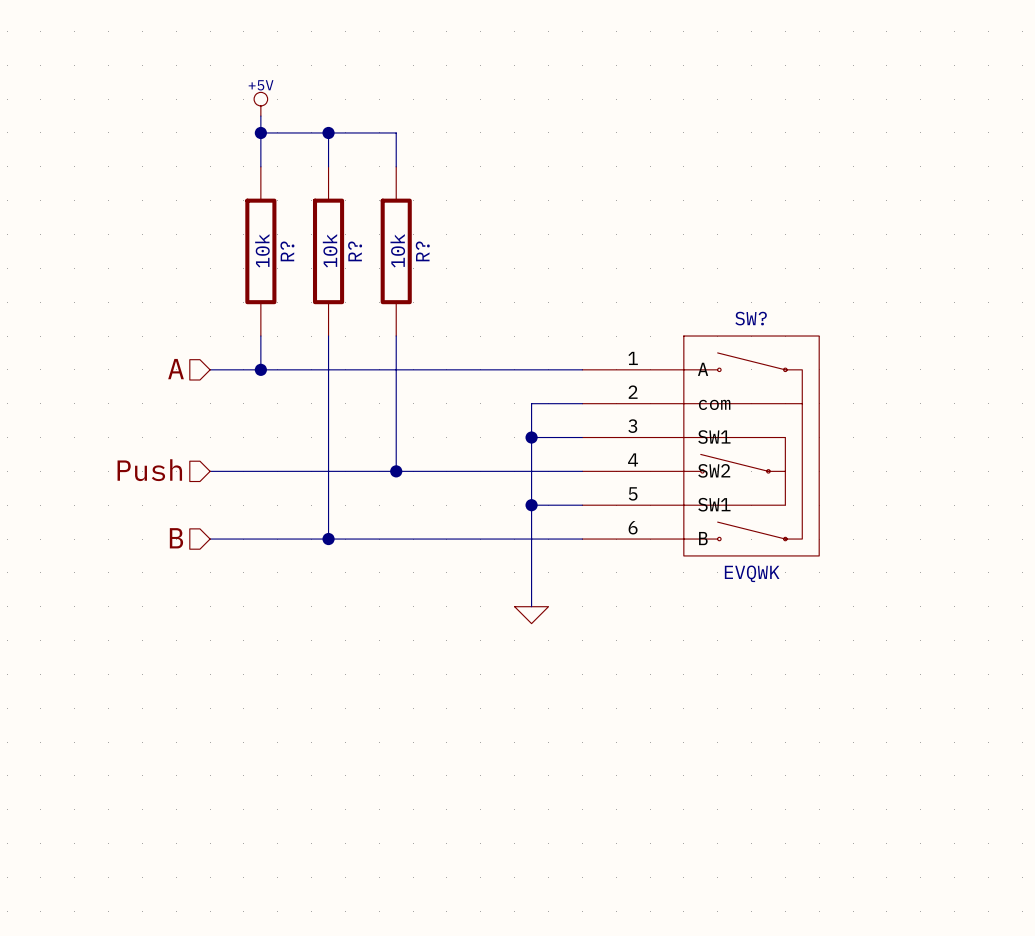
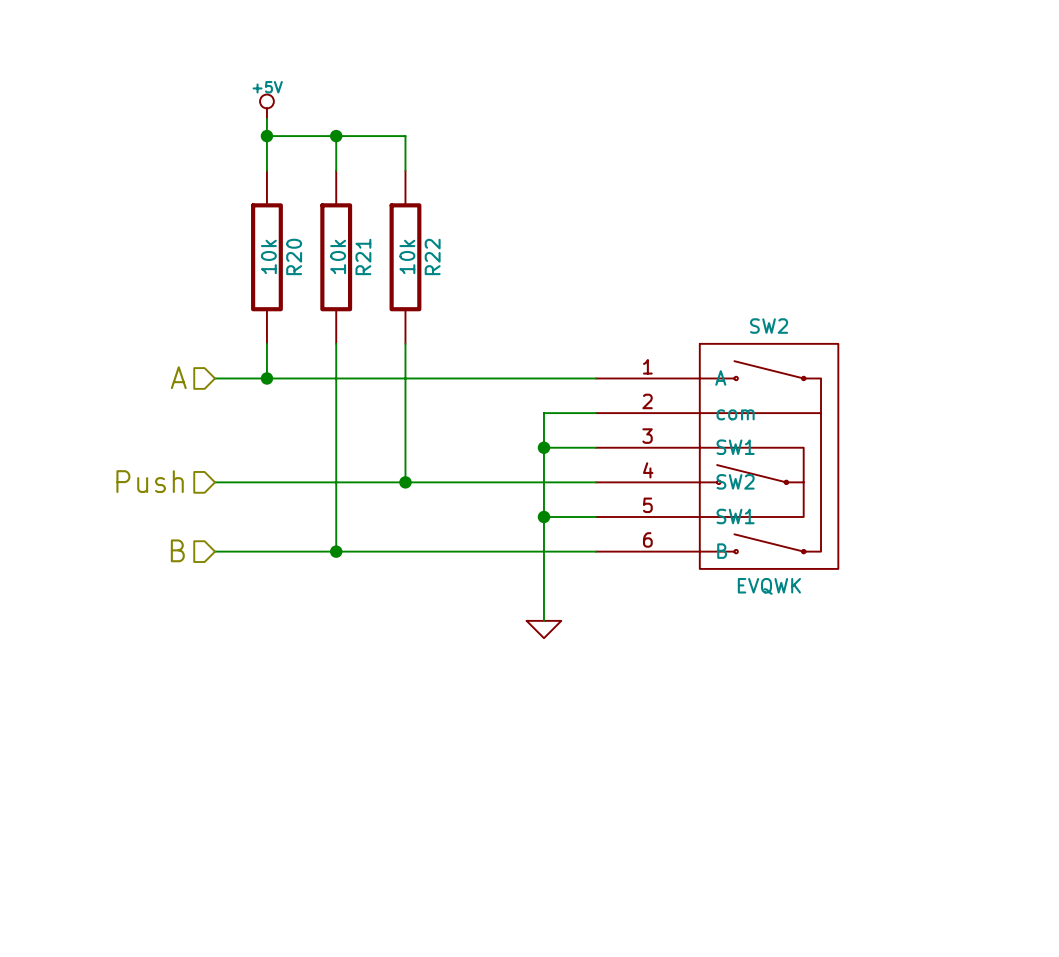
R? name: R? (287, 251) -> R20 (294, 256)
R? name: R? (355, 251) -> R21 (363, 256)
R? name: R? (422, 251) -> R22 (432, 256)
SW? name: SW? (751, 318) -> SW2 (769, 326)

